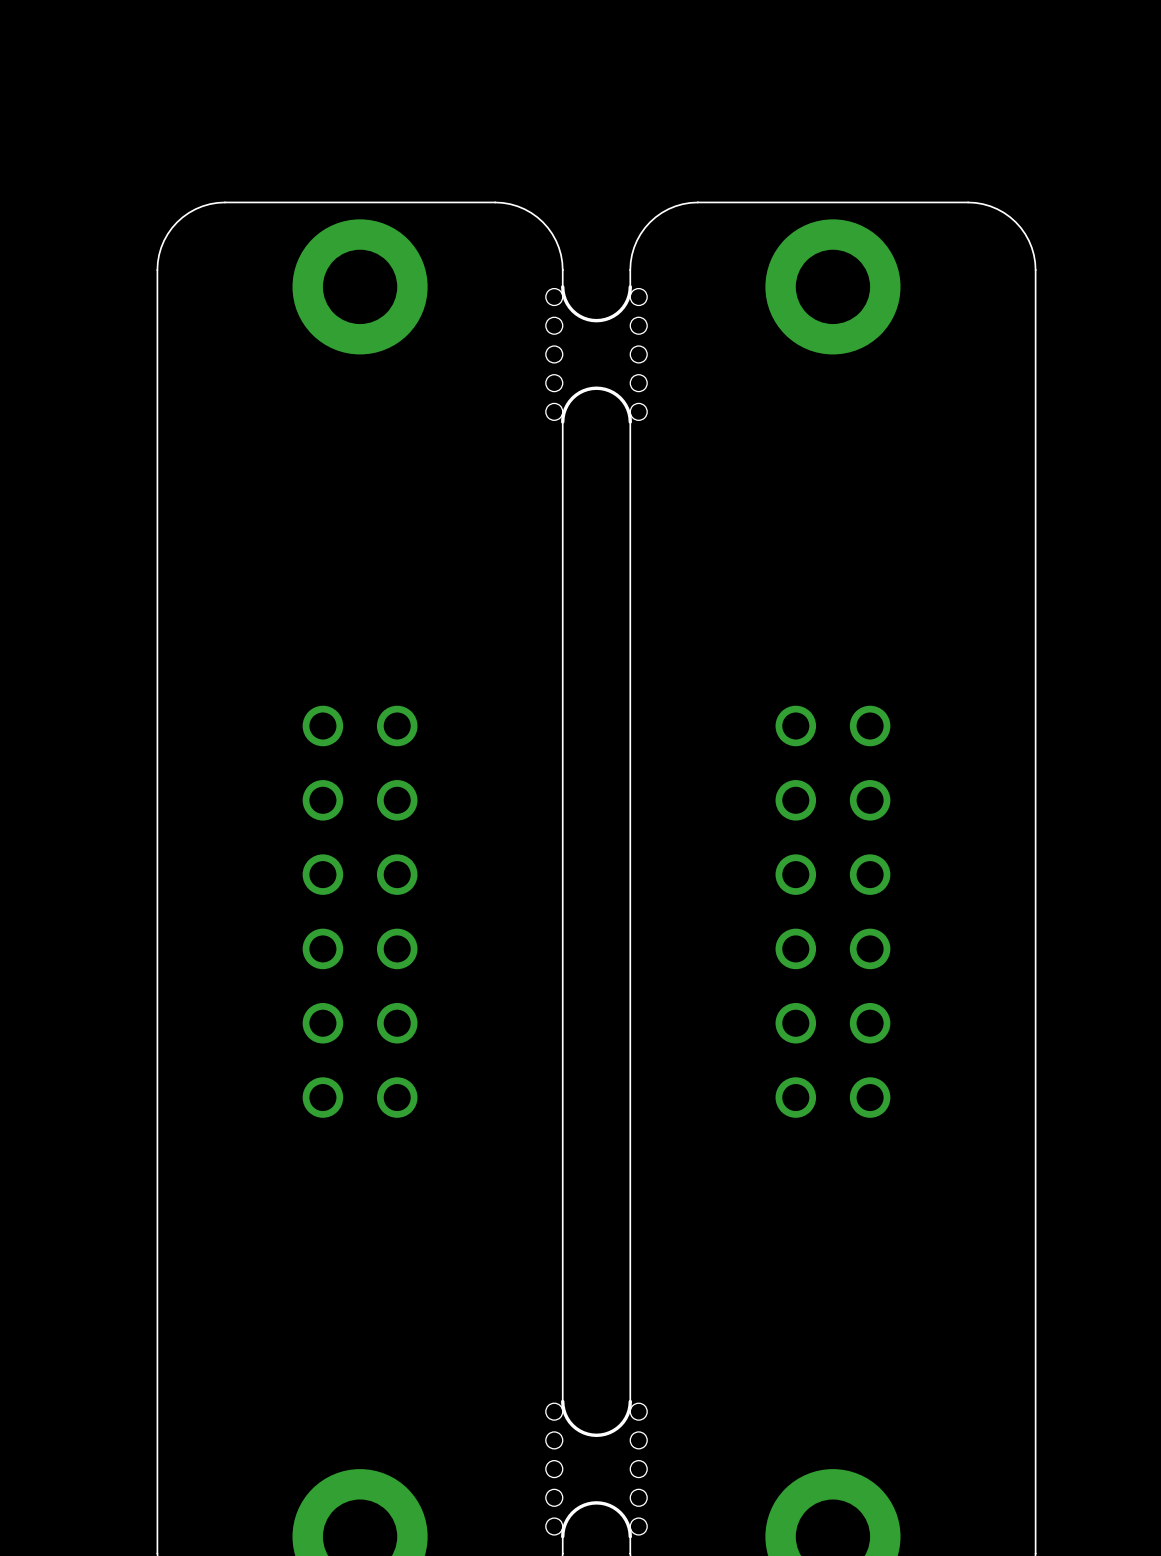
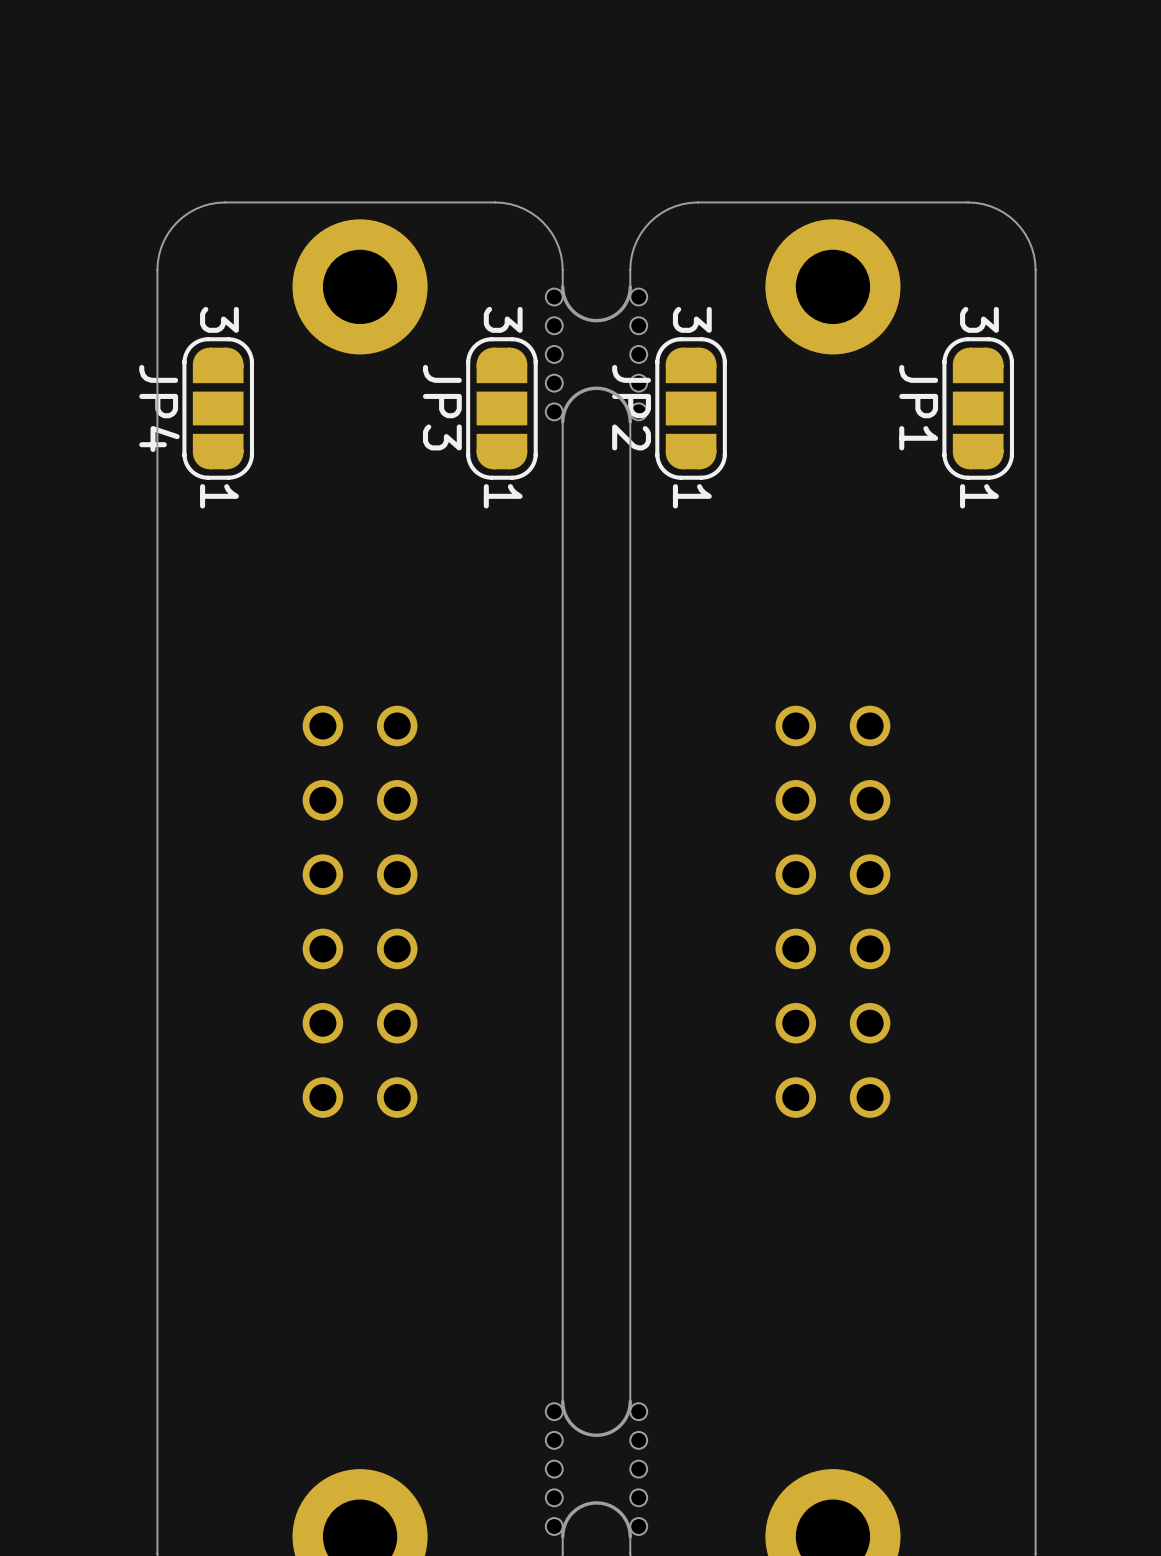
JP4: none -> (218, 408)
JP3: none -> (501, 408)
JP2: none -> (691, 408)
JP1: none -> (978, 408)

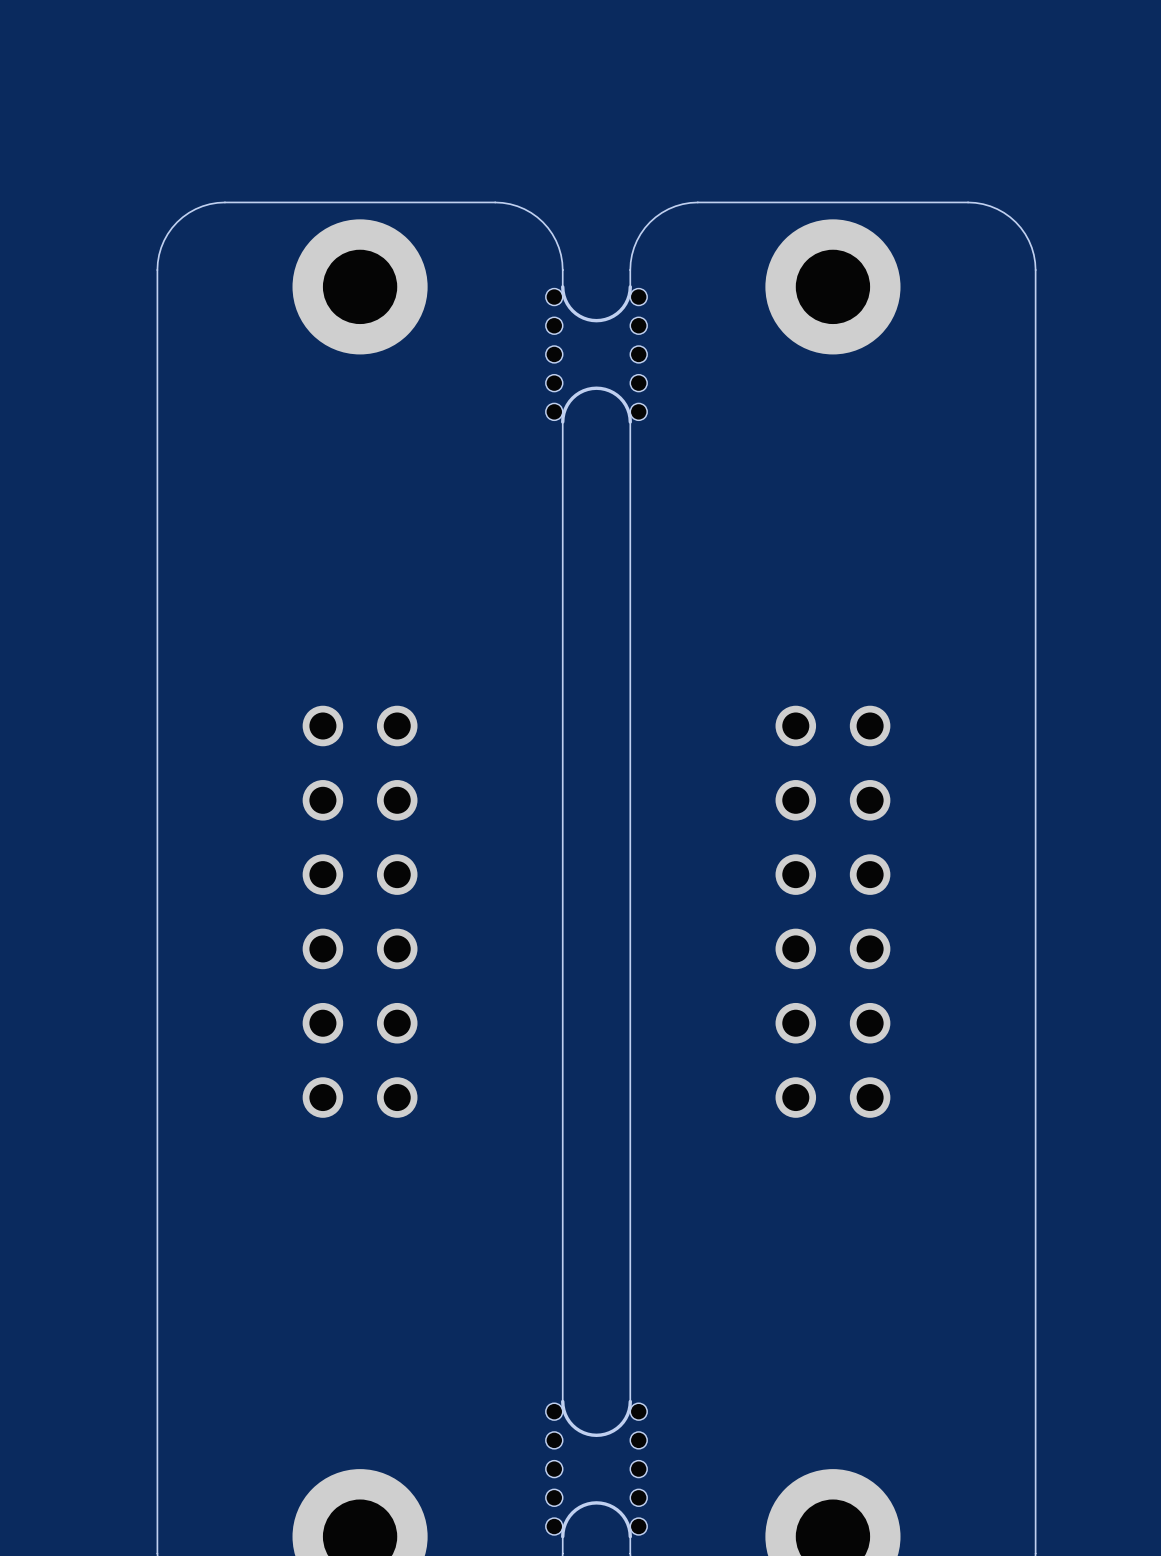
JP4: (218, 408) -> none
JP3: (501, 408) -> none
JP2: (691, 408) -> none
JP1: (978, 408) -> none

